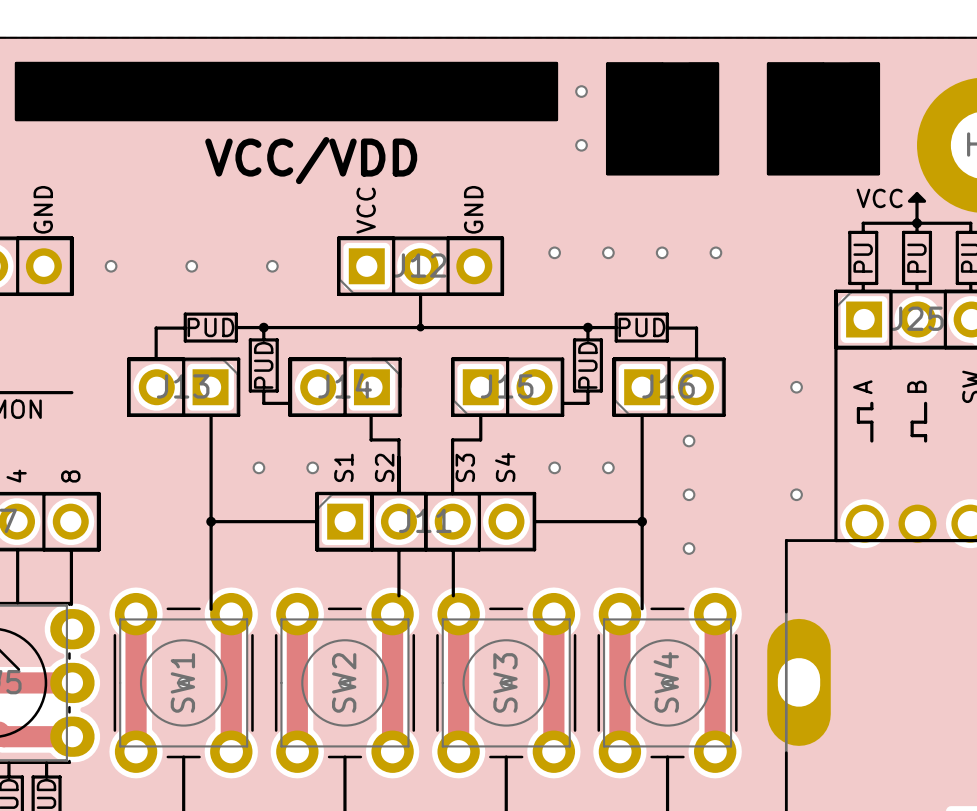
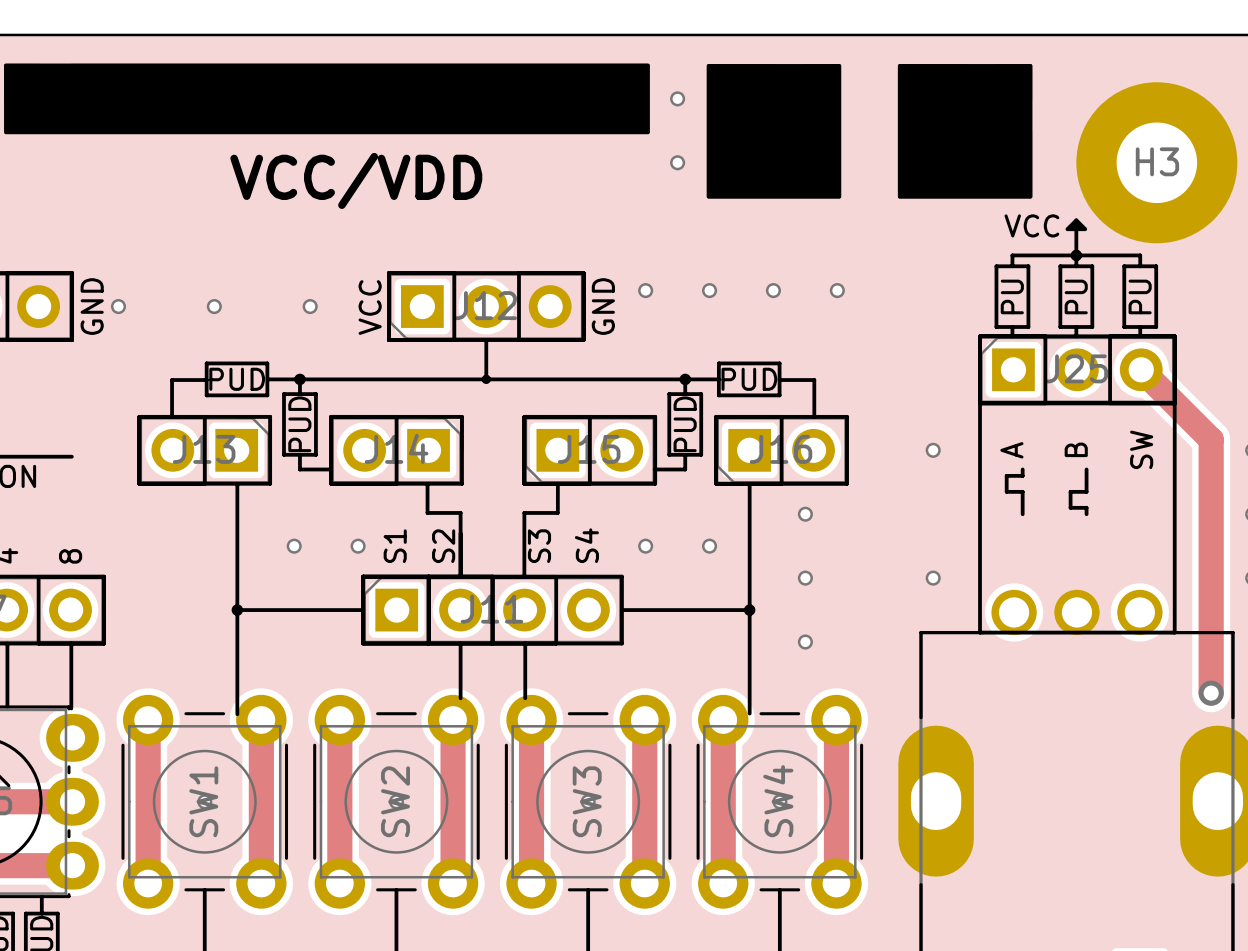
text position: GND (43, 209) -> GND (92, 306)
text position: GND (473, 209) -> GND (603, 306)
text position: VCC (366, 210) -> VCC (370, 307)

